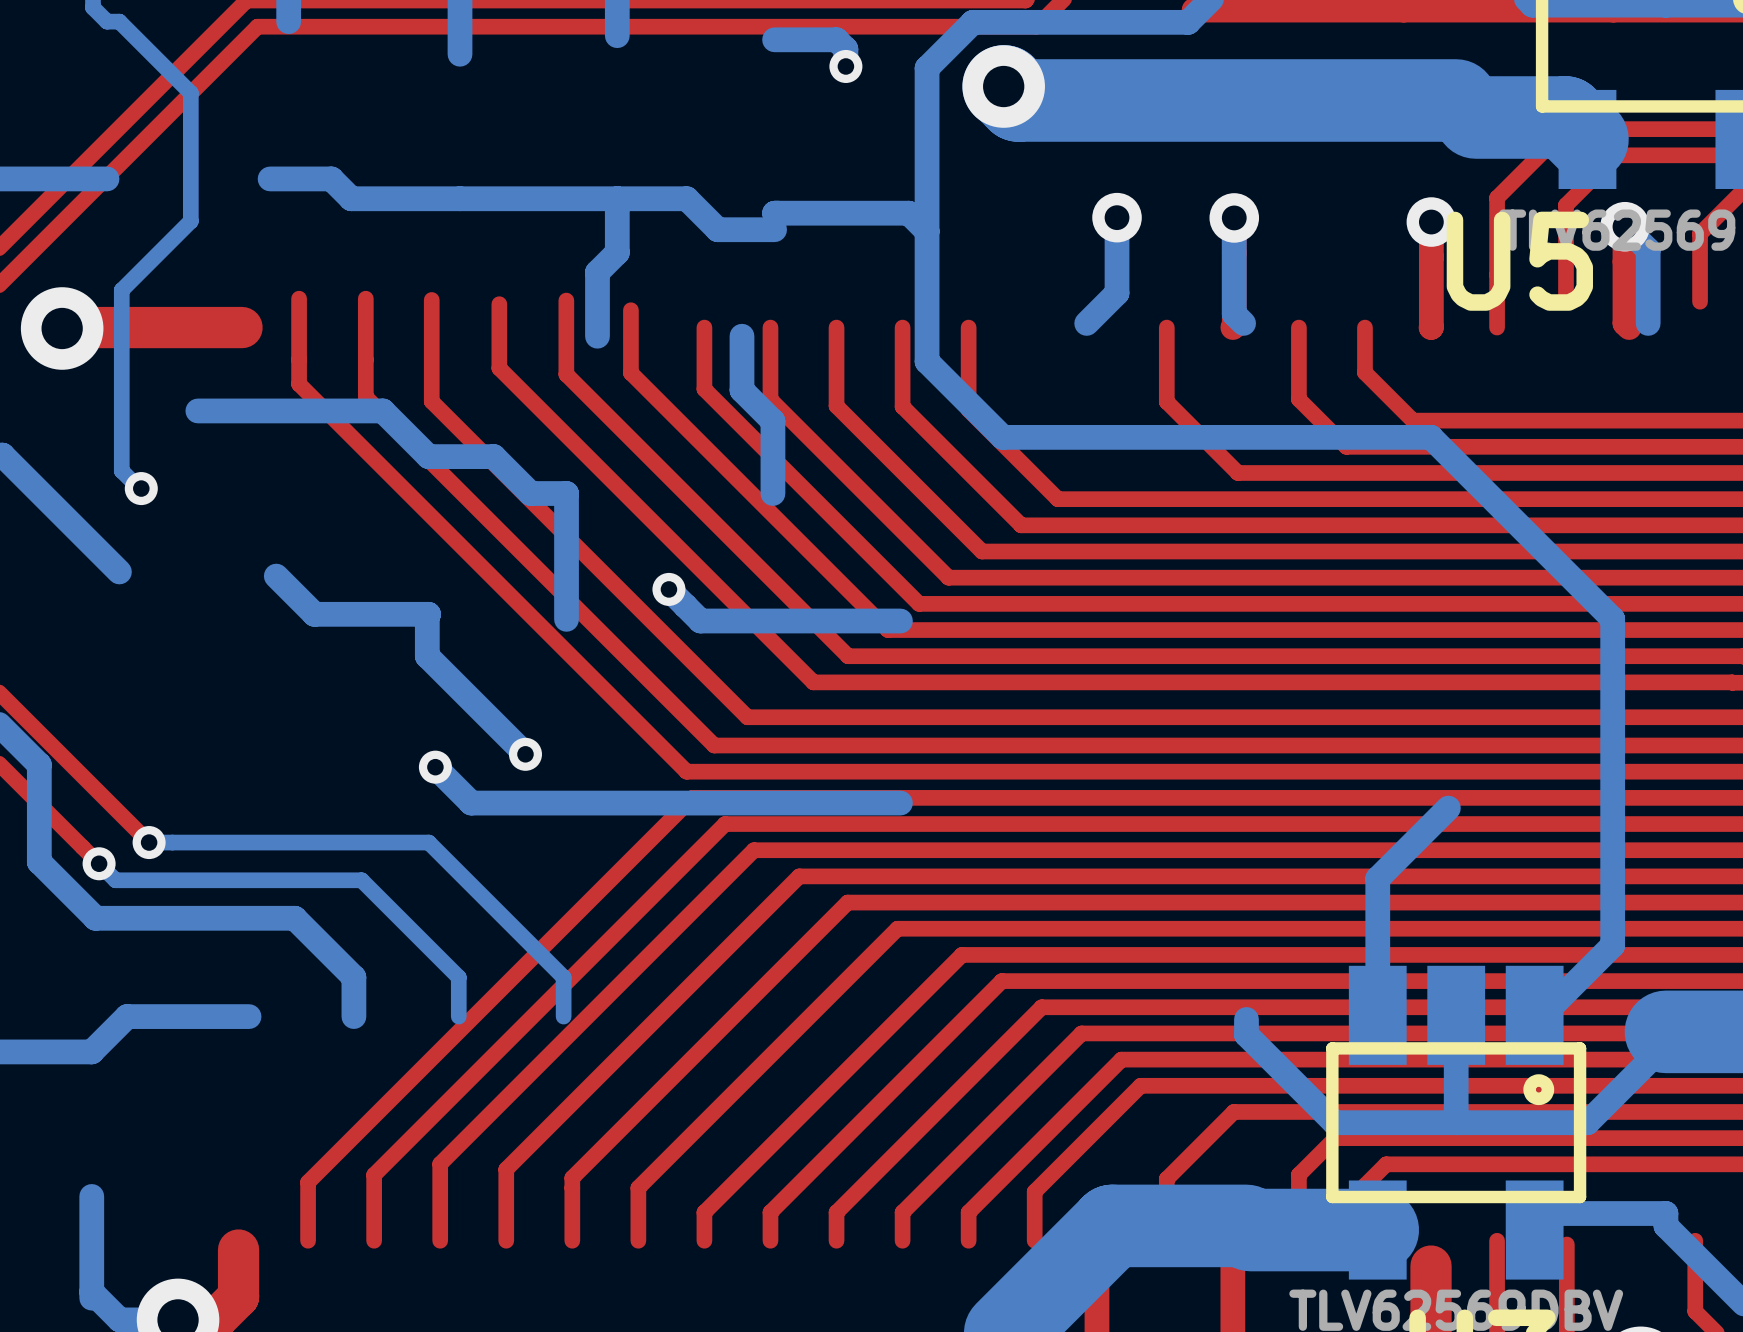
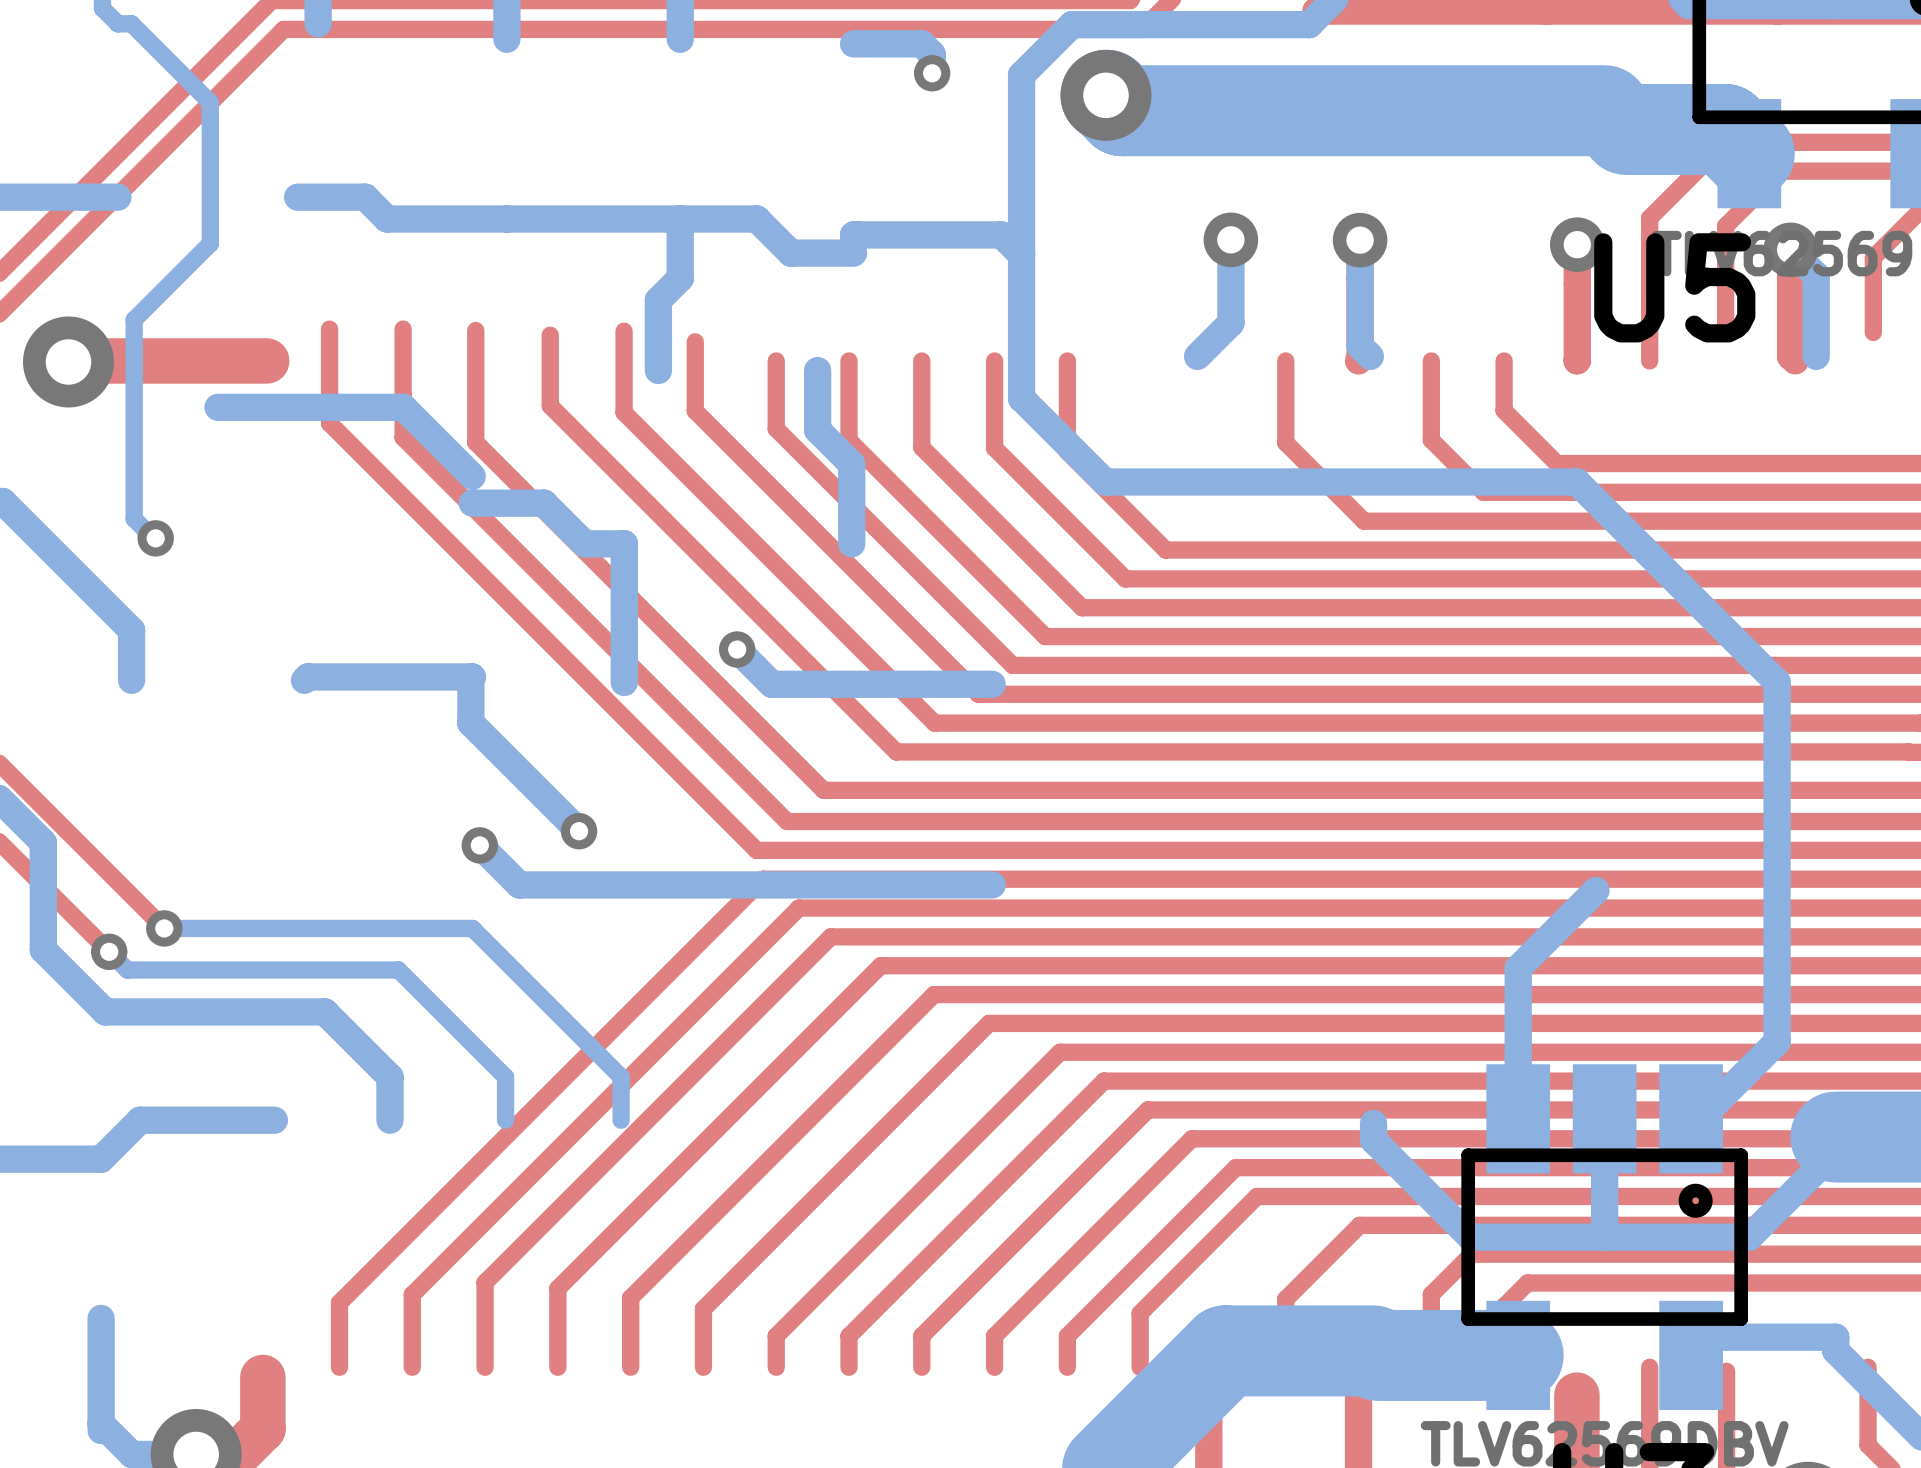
bottom track: (460, 35) (460, 54) -> none
bottom track: none -> (218, 407) (403, 407) (472, 476)
bottom track: (197, 410) (382, 410) (428, 456) -> none
bottom track: none -> (131, 630) (131, 680)
bottom track: (276, 576) (314, 614) -> (304, 680) (307, 676) (346, 676)

